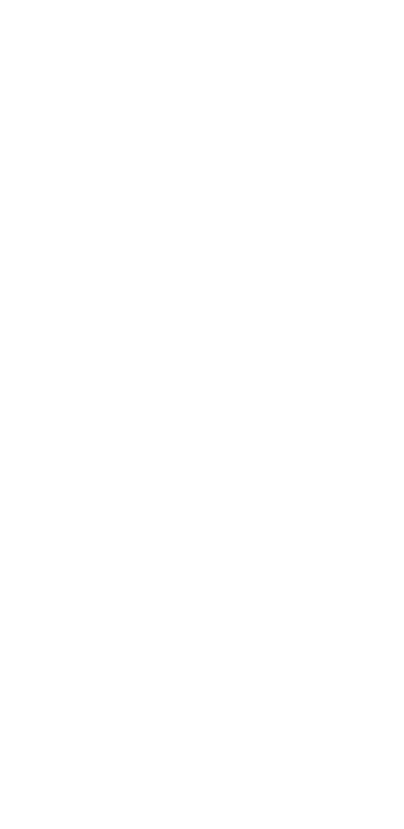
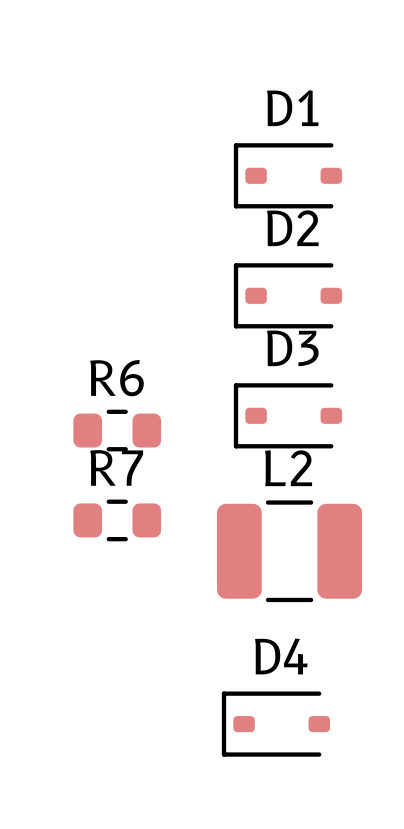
D1: none -> (287, 175)
D2: none -> (287, 295)
D3: none -> (287, 415)
R6: none -> (117, 430)
R7: none -> (117, 520)
L2: none -> (289, 551)
D4: none -> (275, 724)

